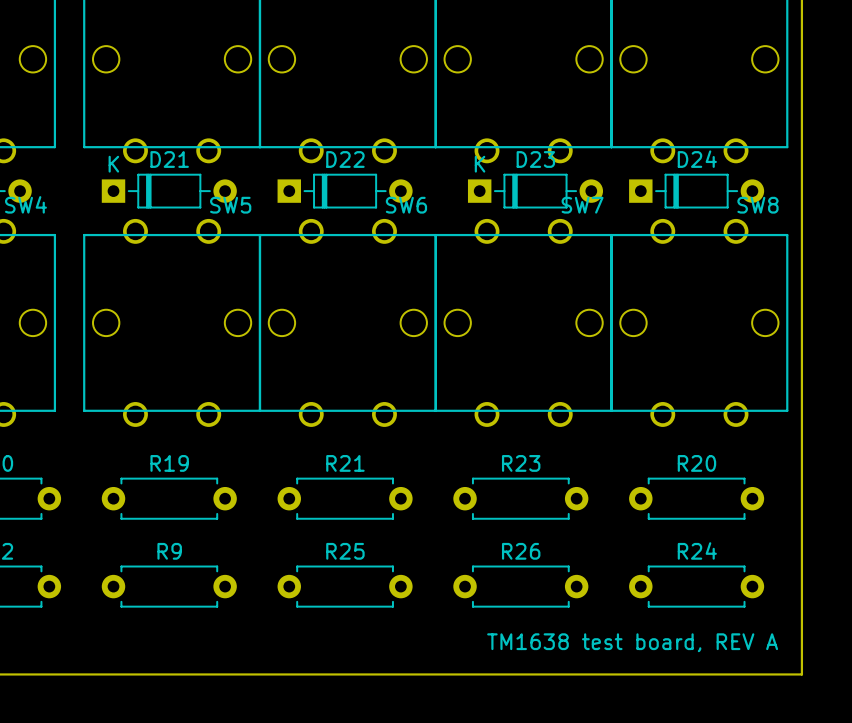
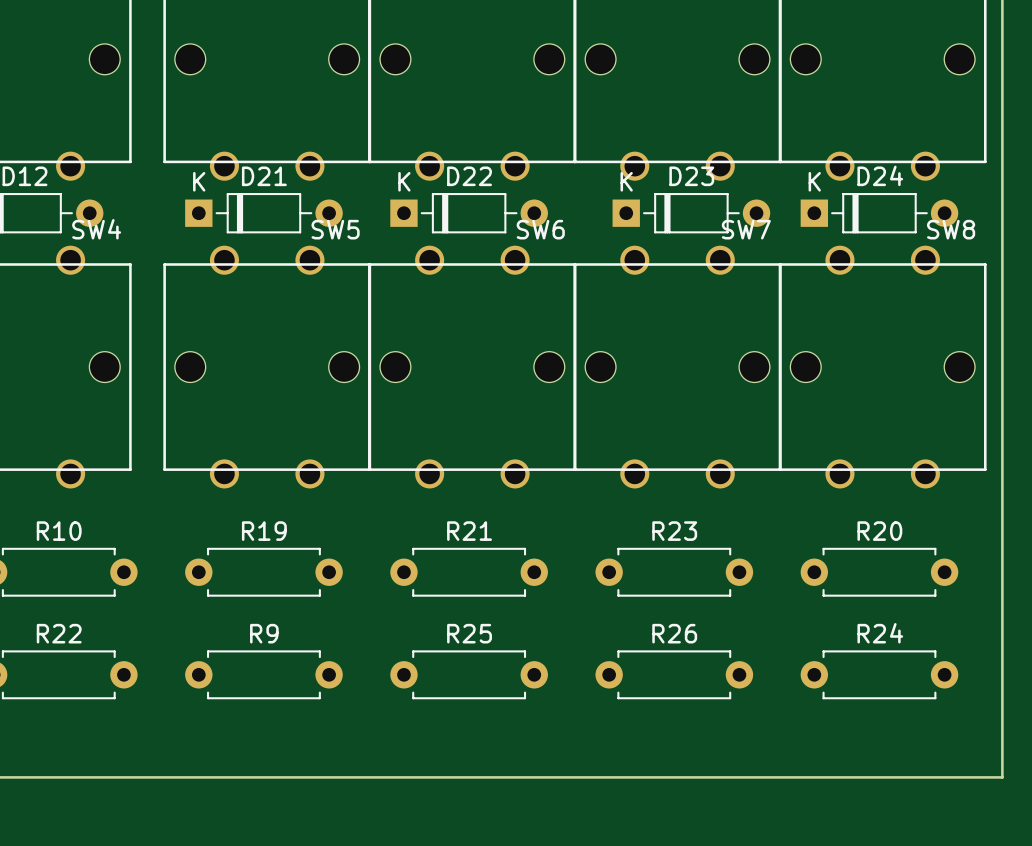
D22 text: none -> K (404, 181)
D24 text: none -> K (814, 181)
text: TM1638 test board, REV A (632, 642) -> none

